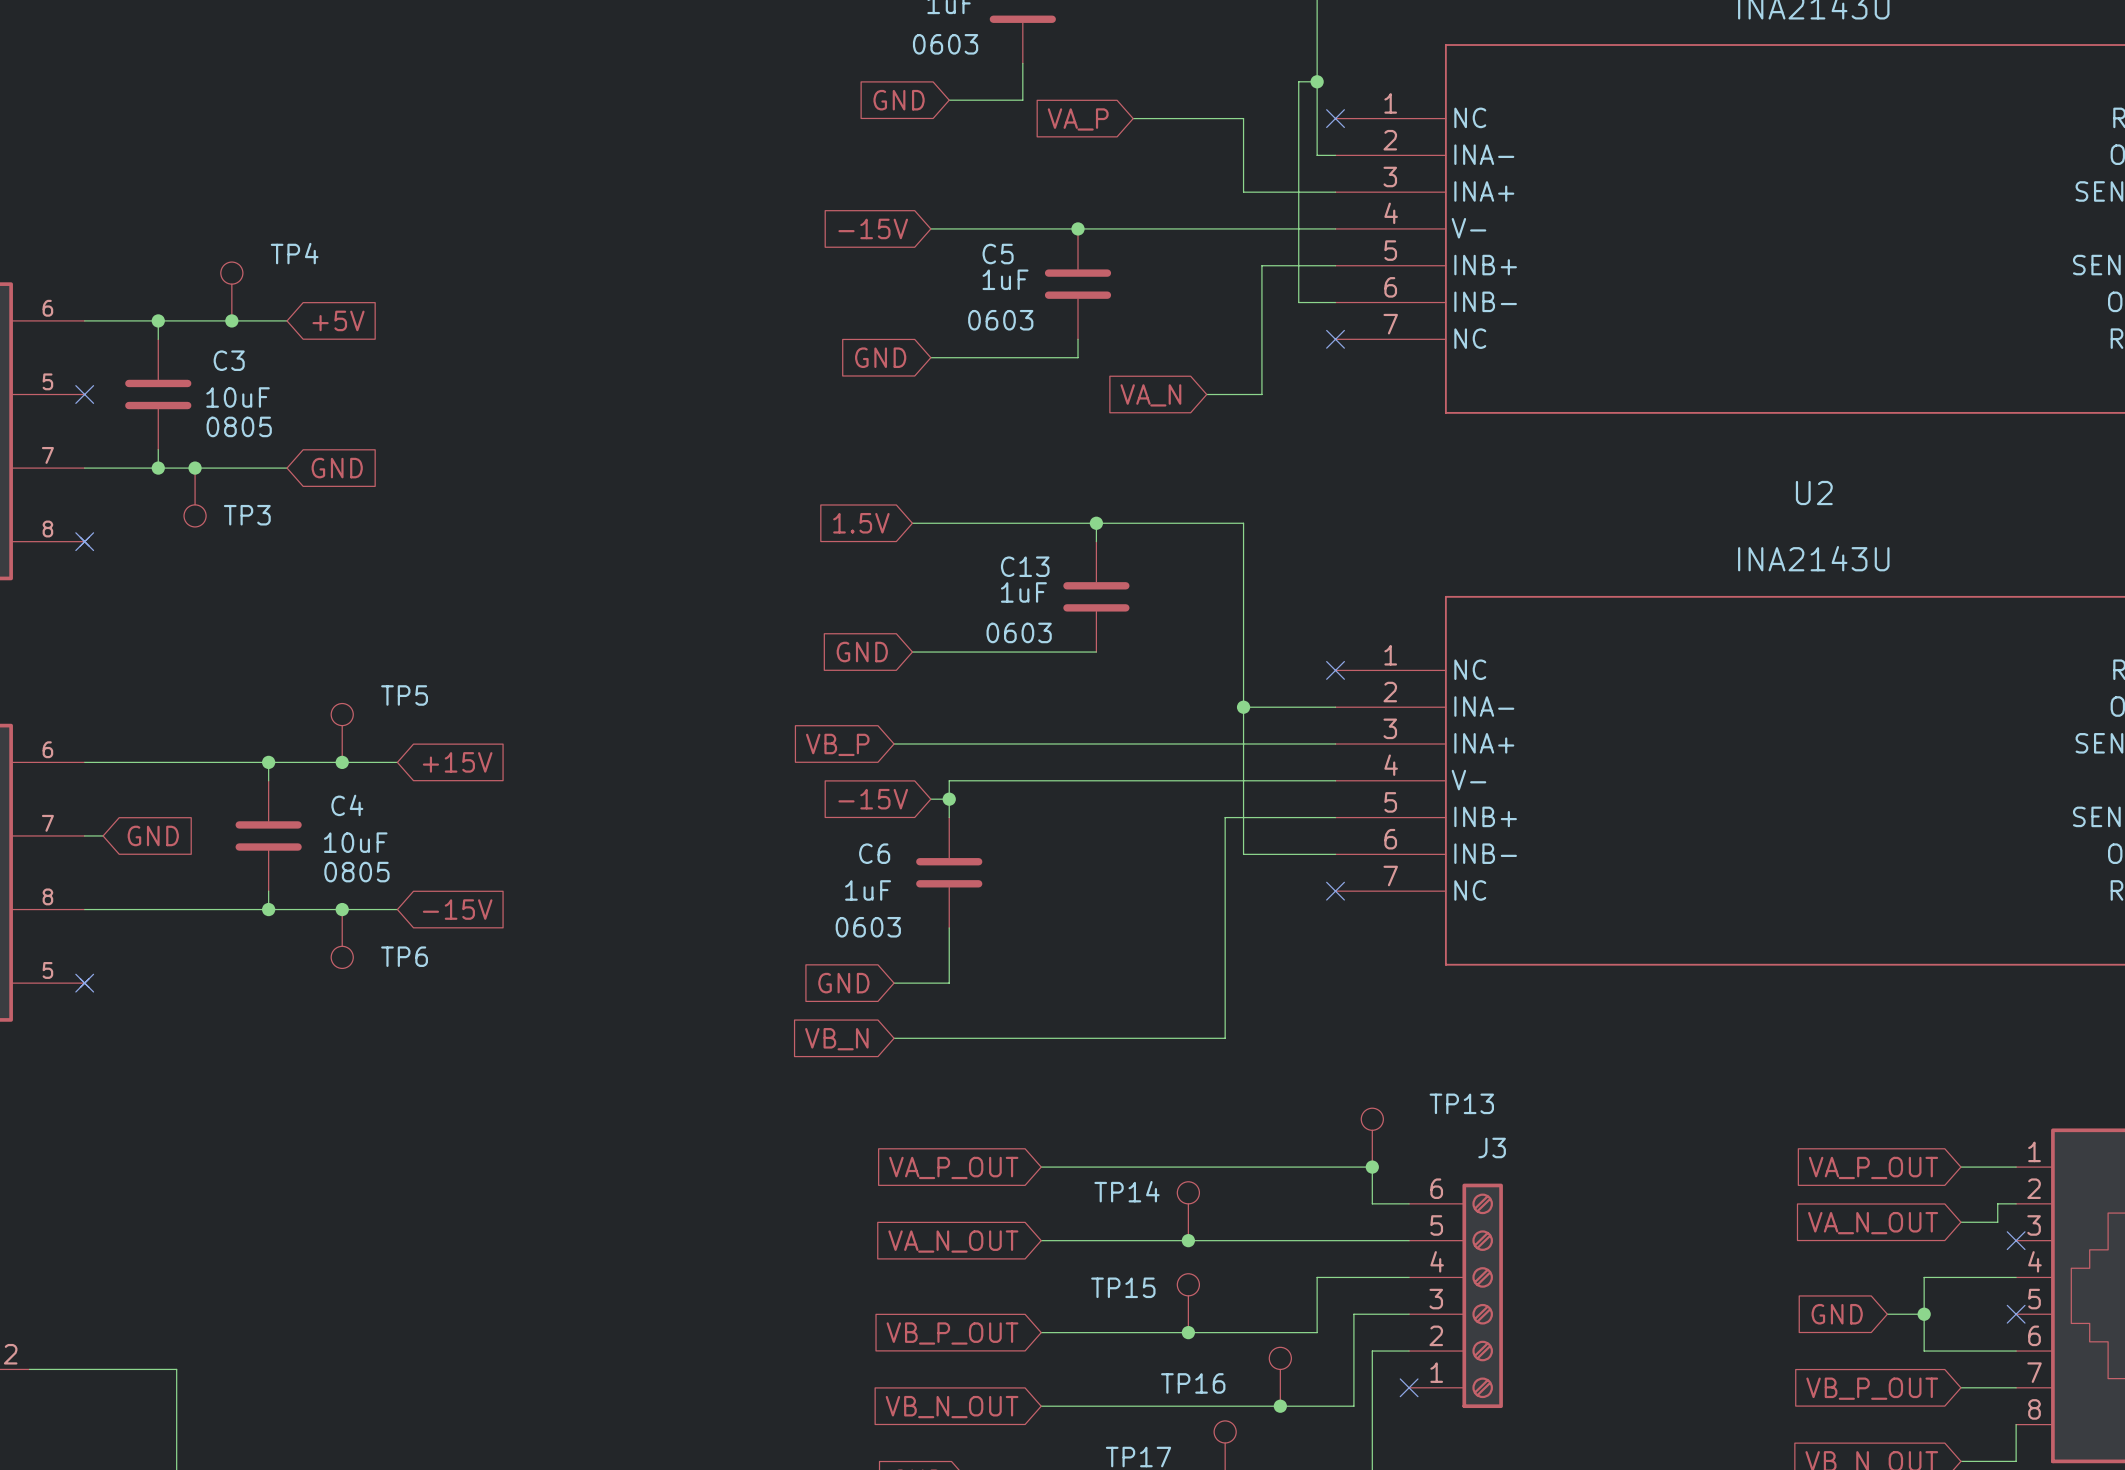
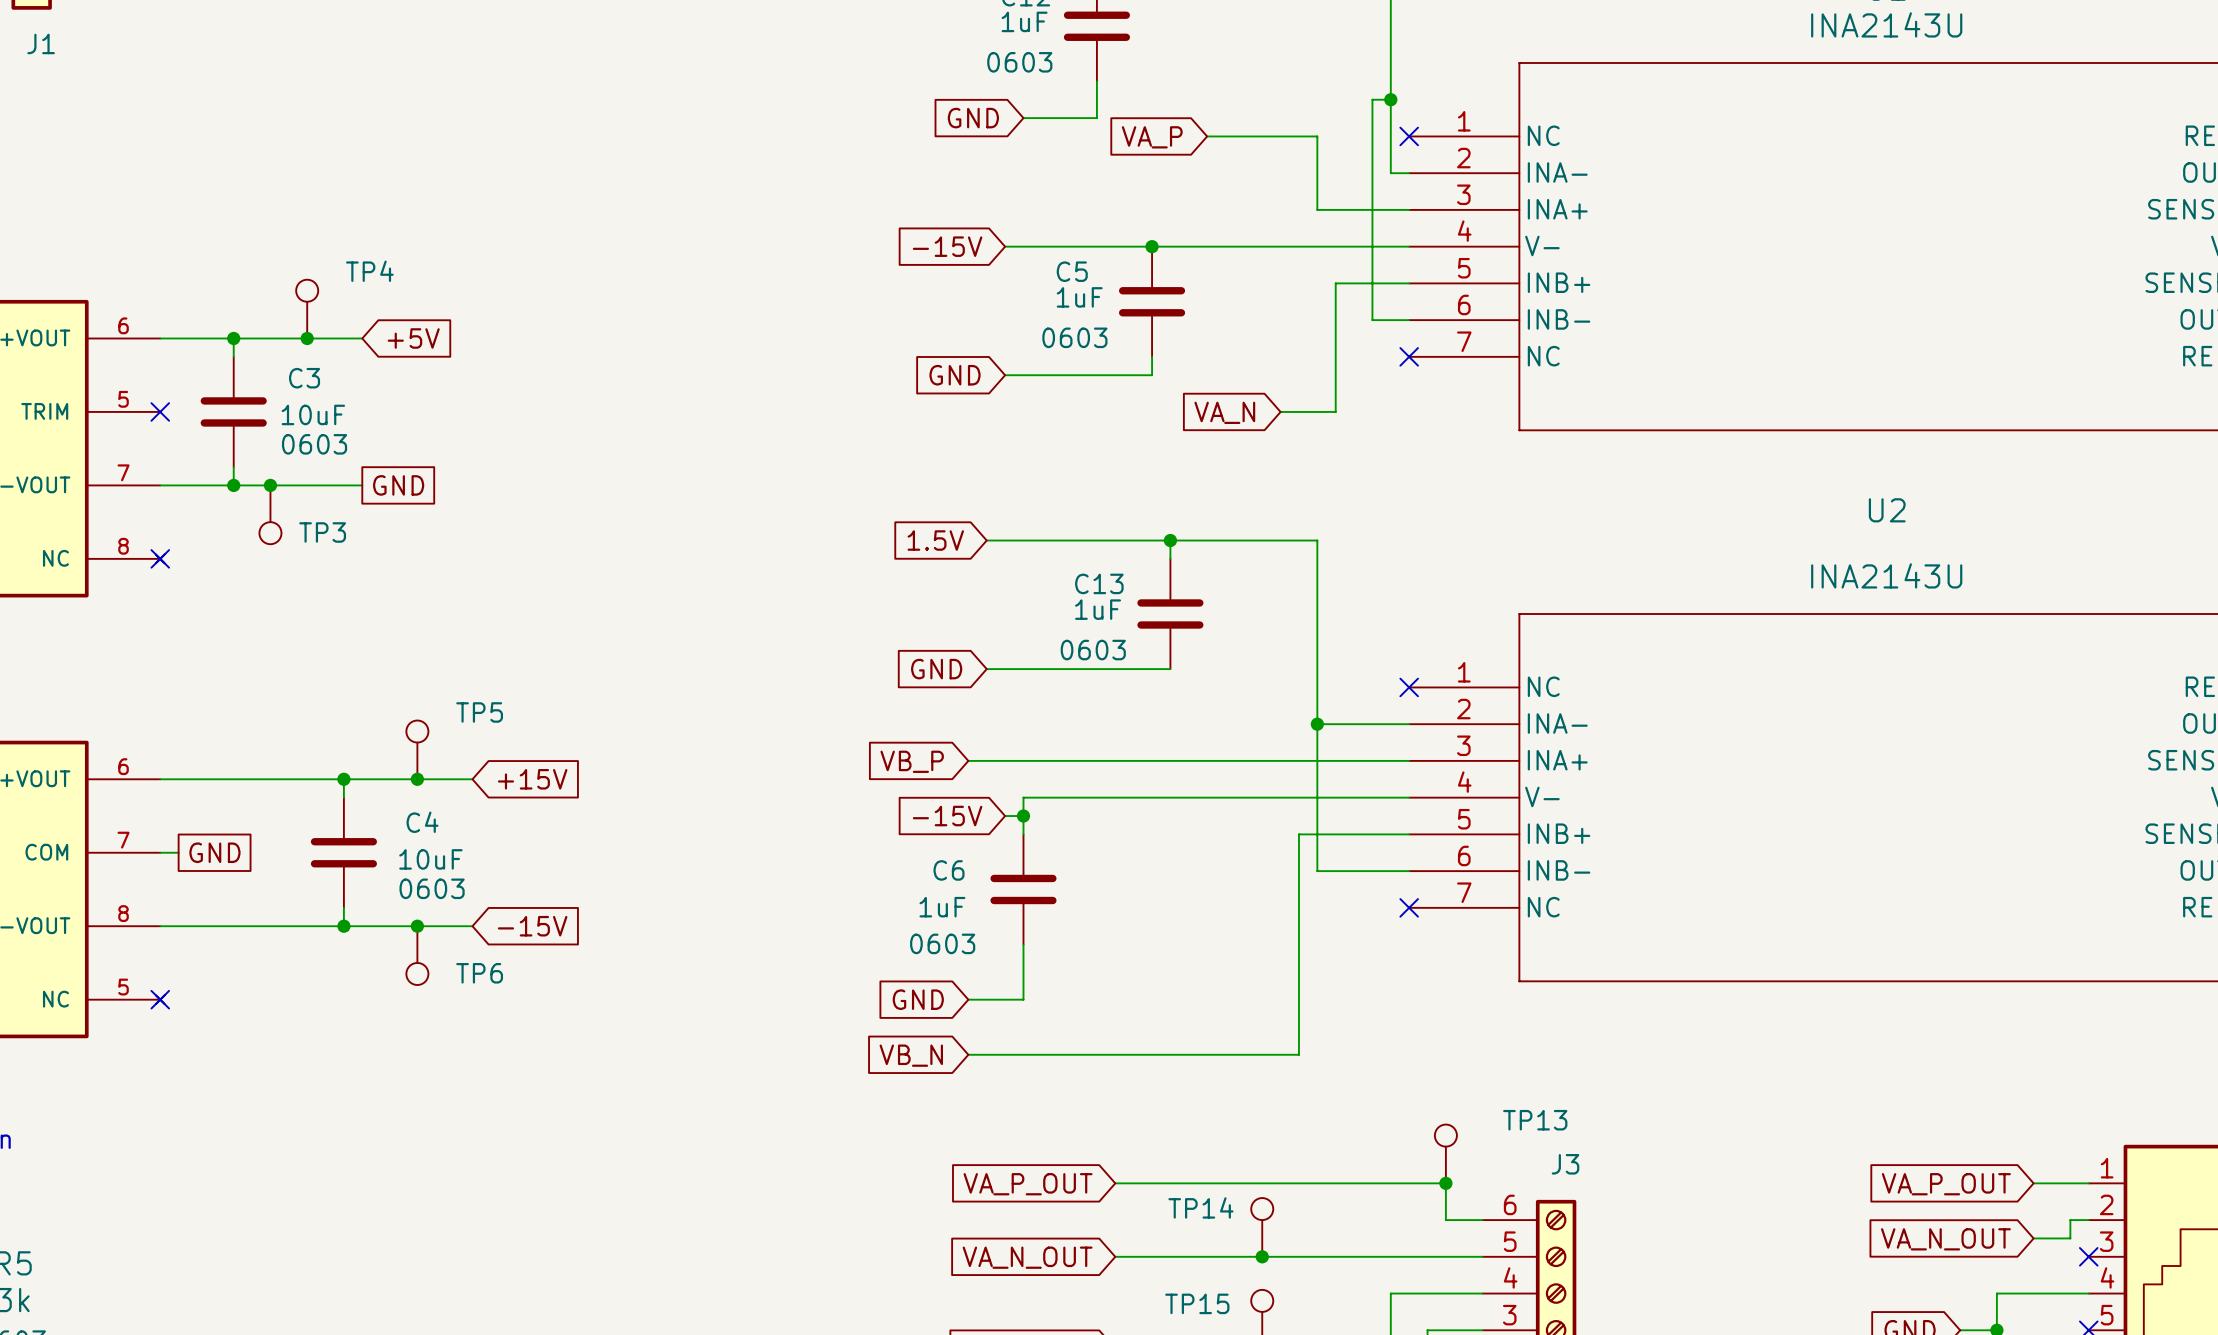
C3 text: 0805 (239, 426) -> 0603 (314, 444)
global label shape: input (337, 468) -> passive (398, 485)
global label shape: input (153, 835) -> passive (214, 852)
C4 text: 0805 (356, 872) -> 0603 (432, 888)

